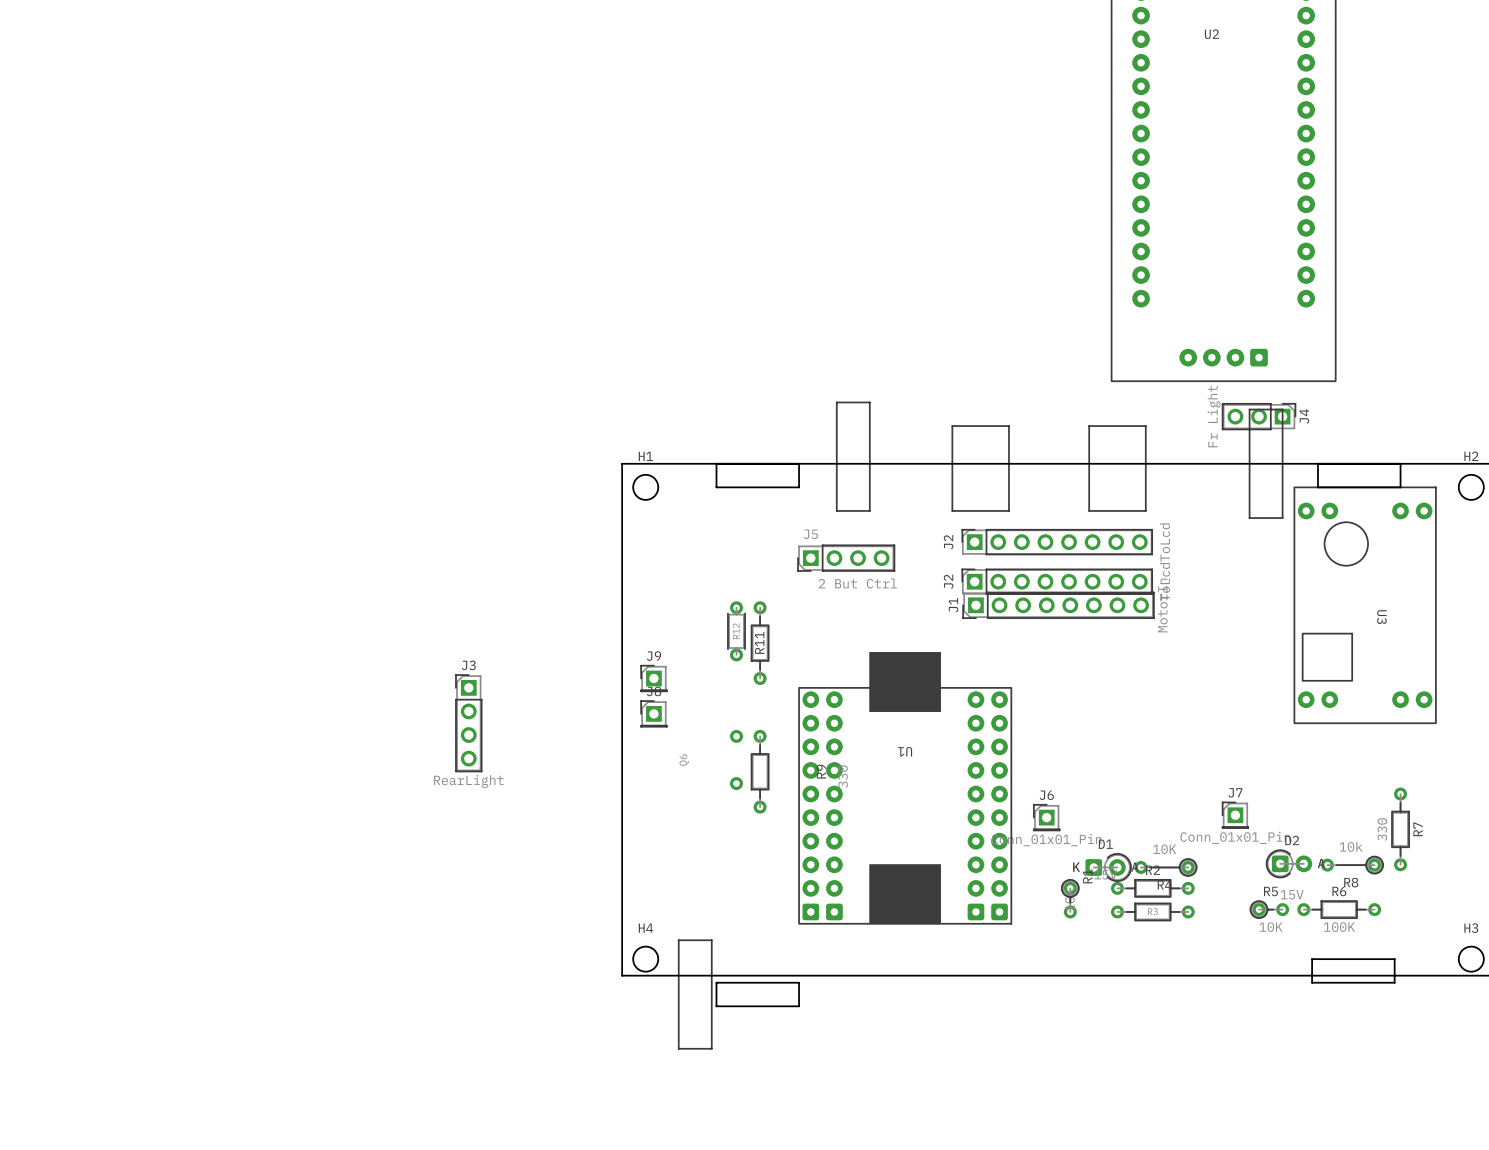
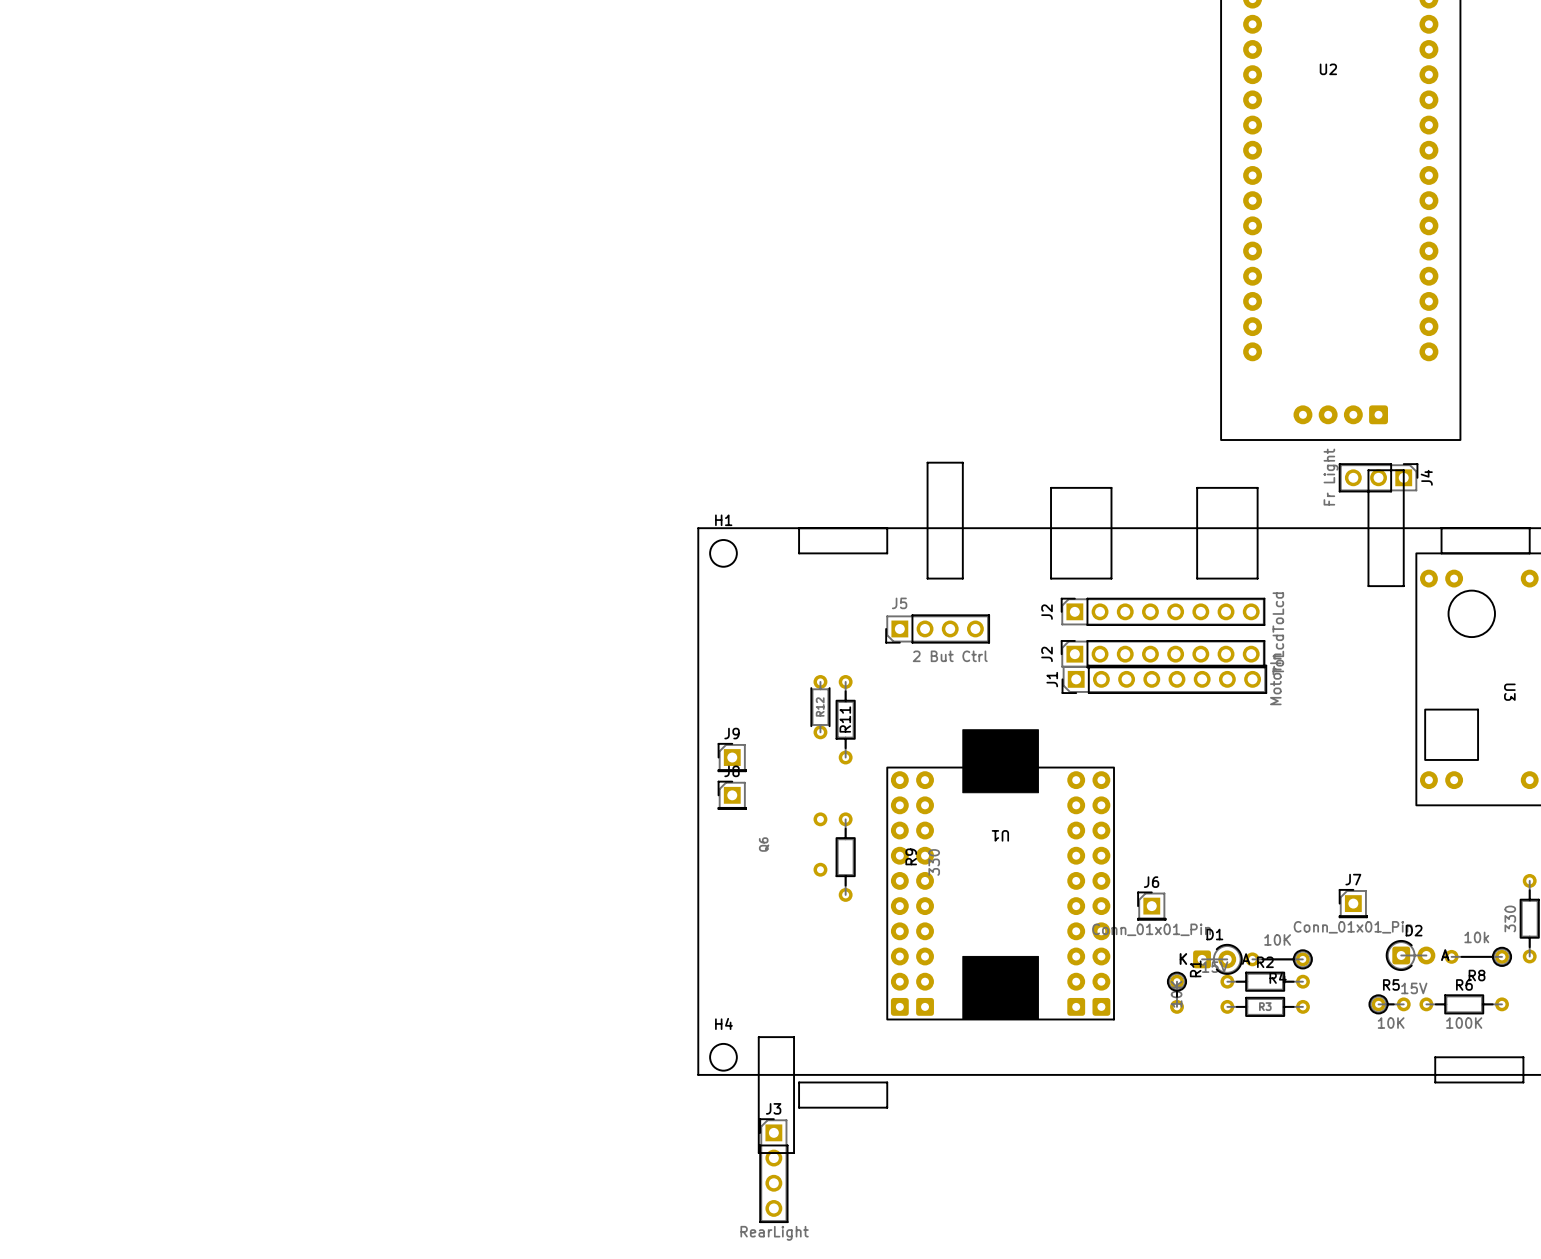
J3 position: (468, 723) -> (773, 1170)

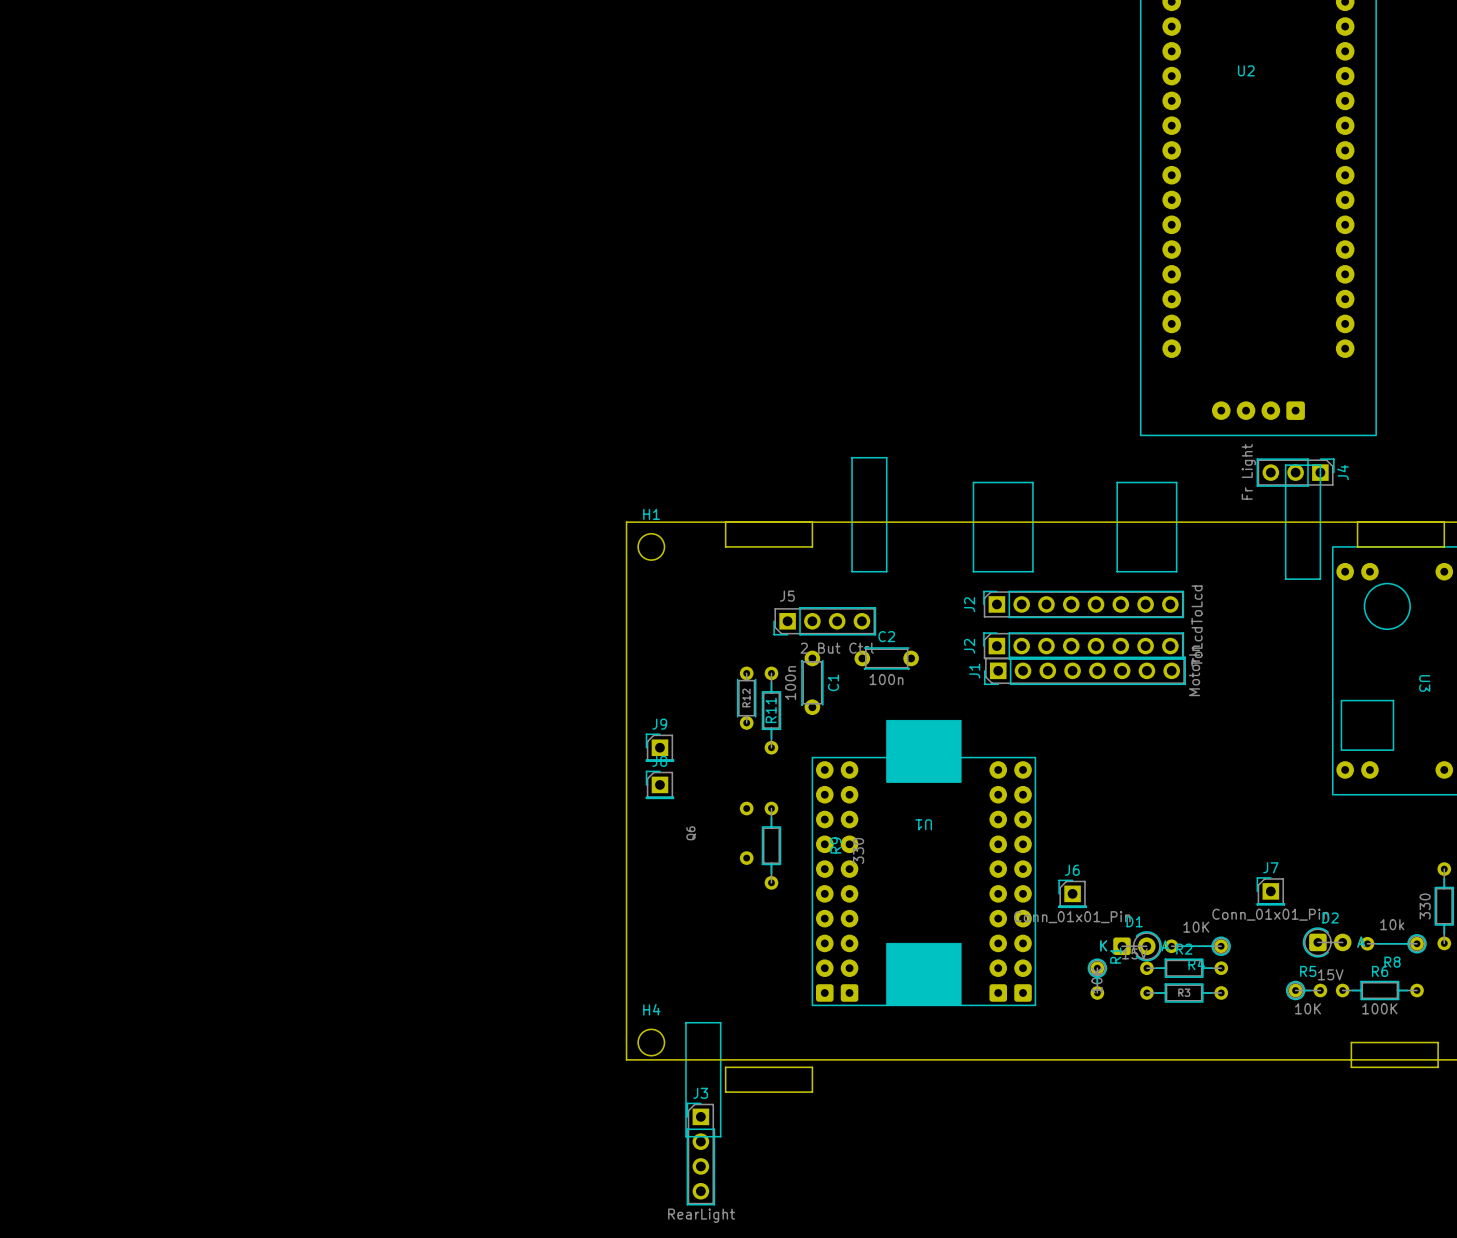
J5 position: (937, 628) -> (824, 621)
C2: none -> 100n (886, 658)
C1: none -> 100n (812, 682)

